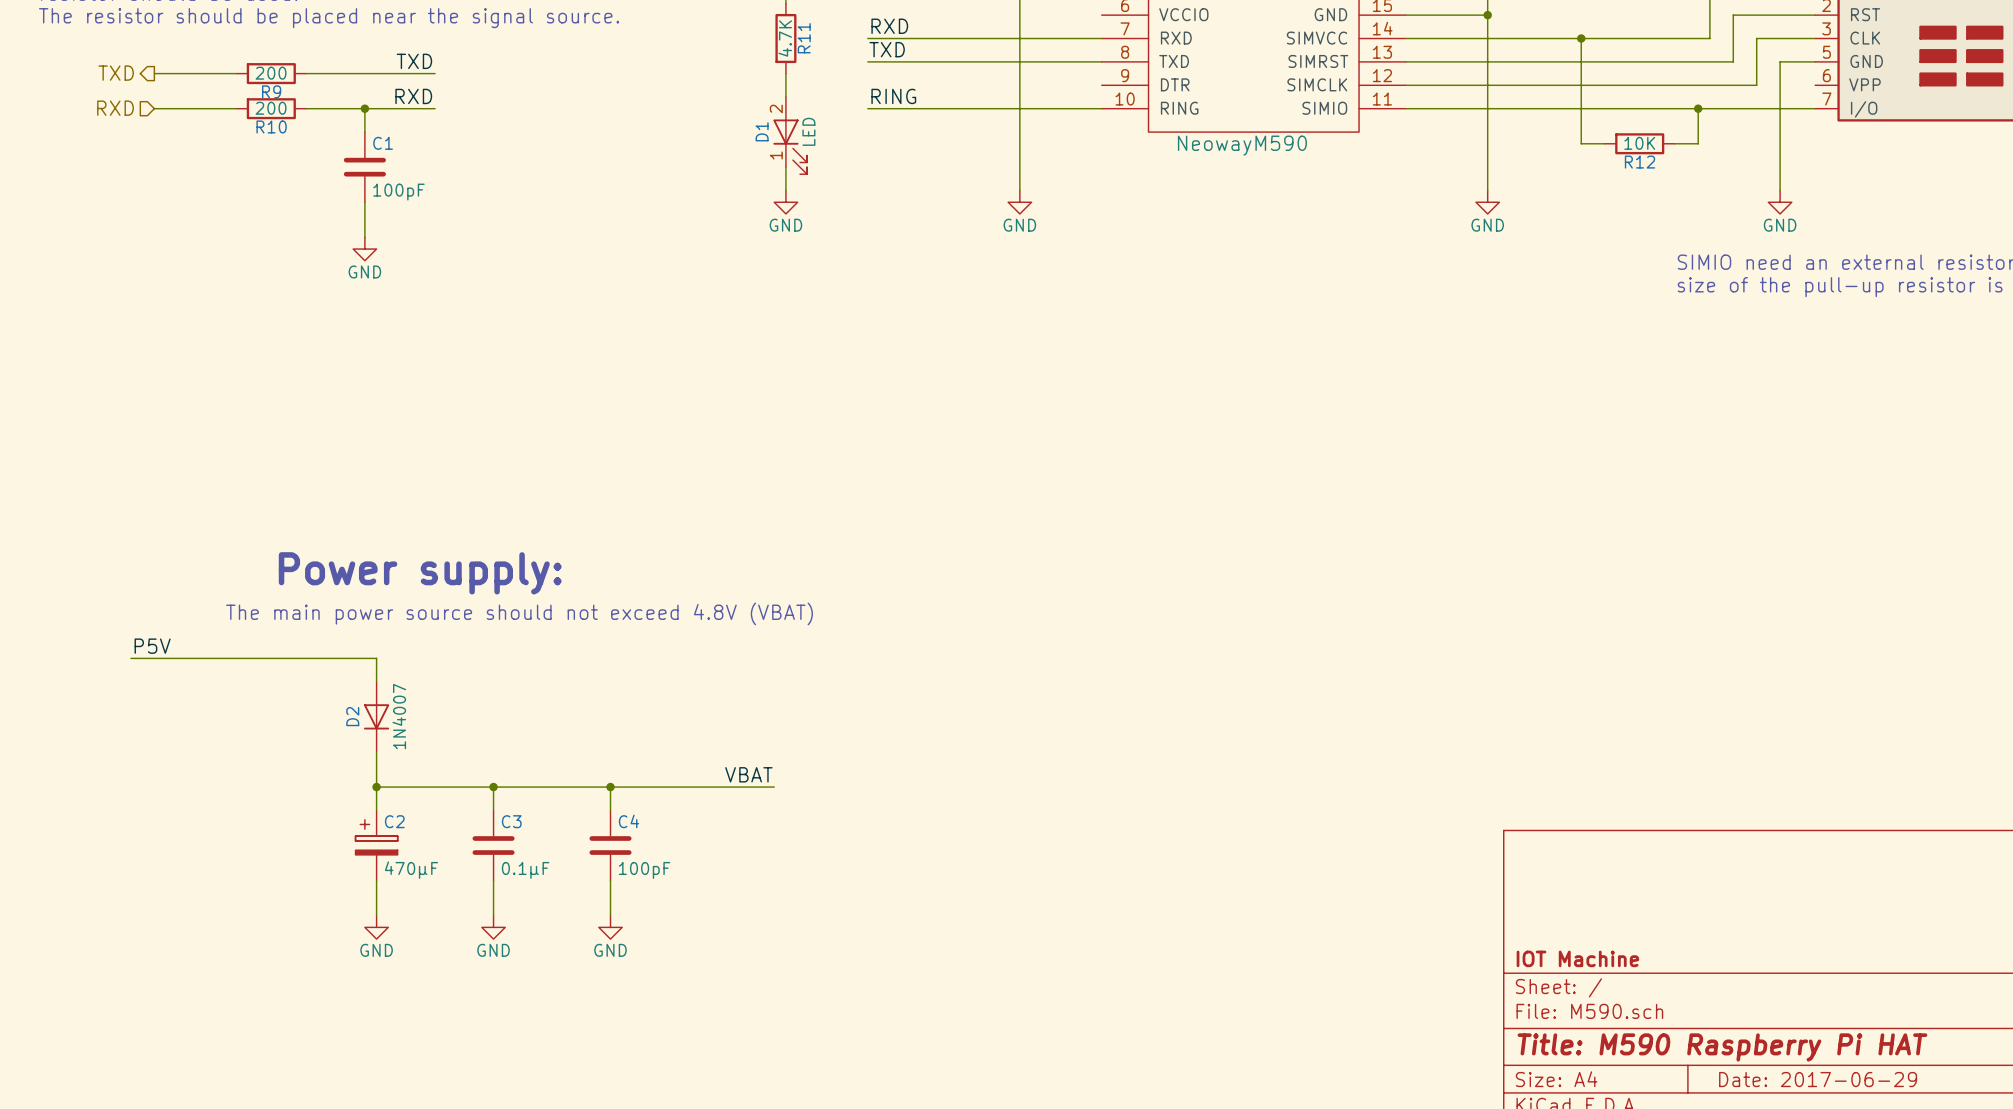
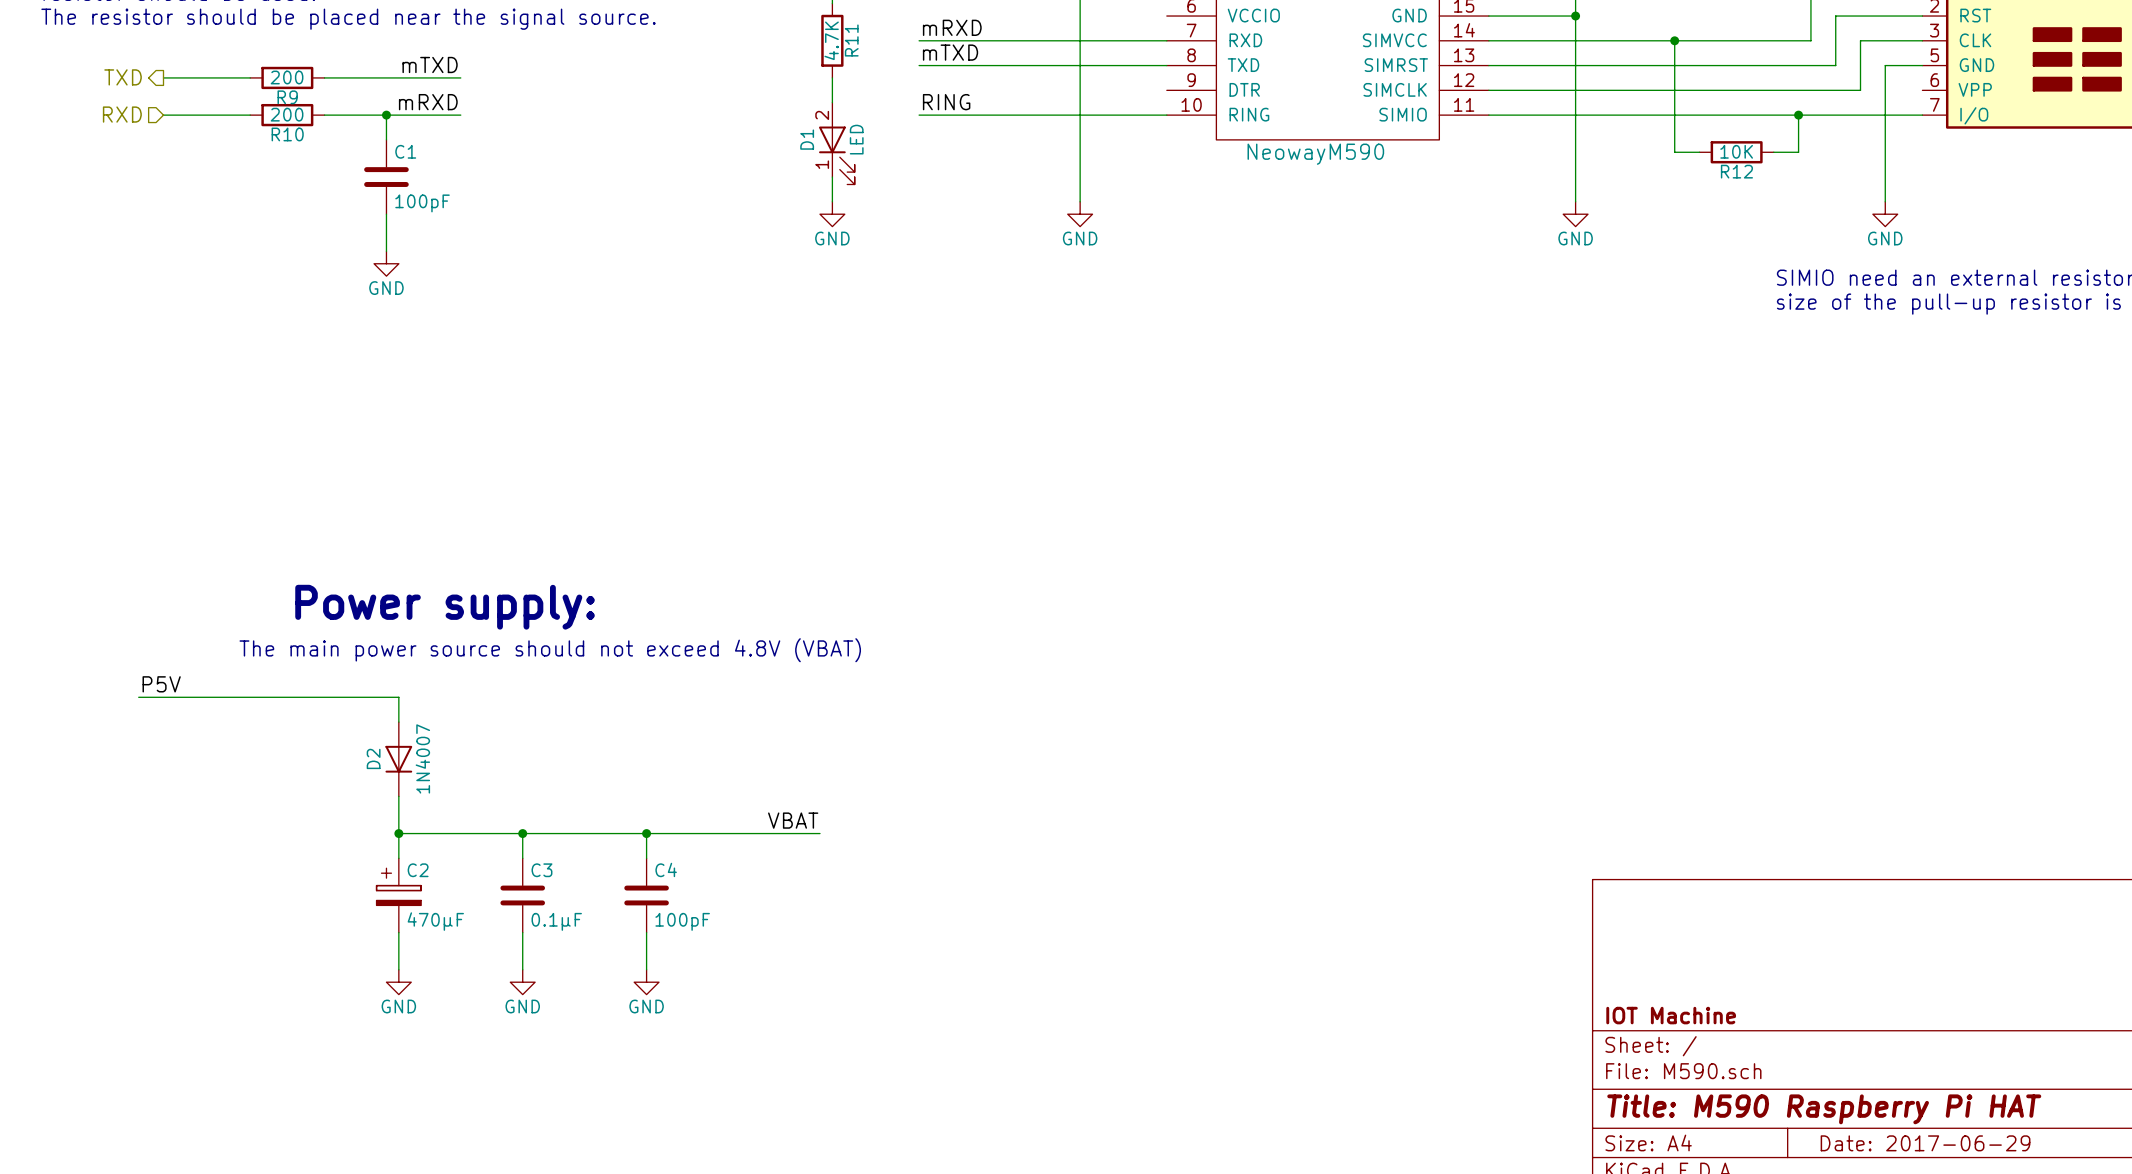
label: RXD (889, 26) -> mRXD (952, 27)
label: TXD (887, 49) -> mTXD (950, 52)
label: TXD (414, 61) -> mTXD (430, 64)
label: RXD (413, 96) -> mRXD (428, 102)

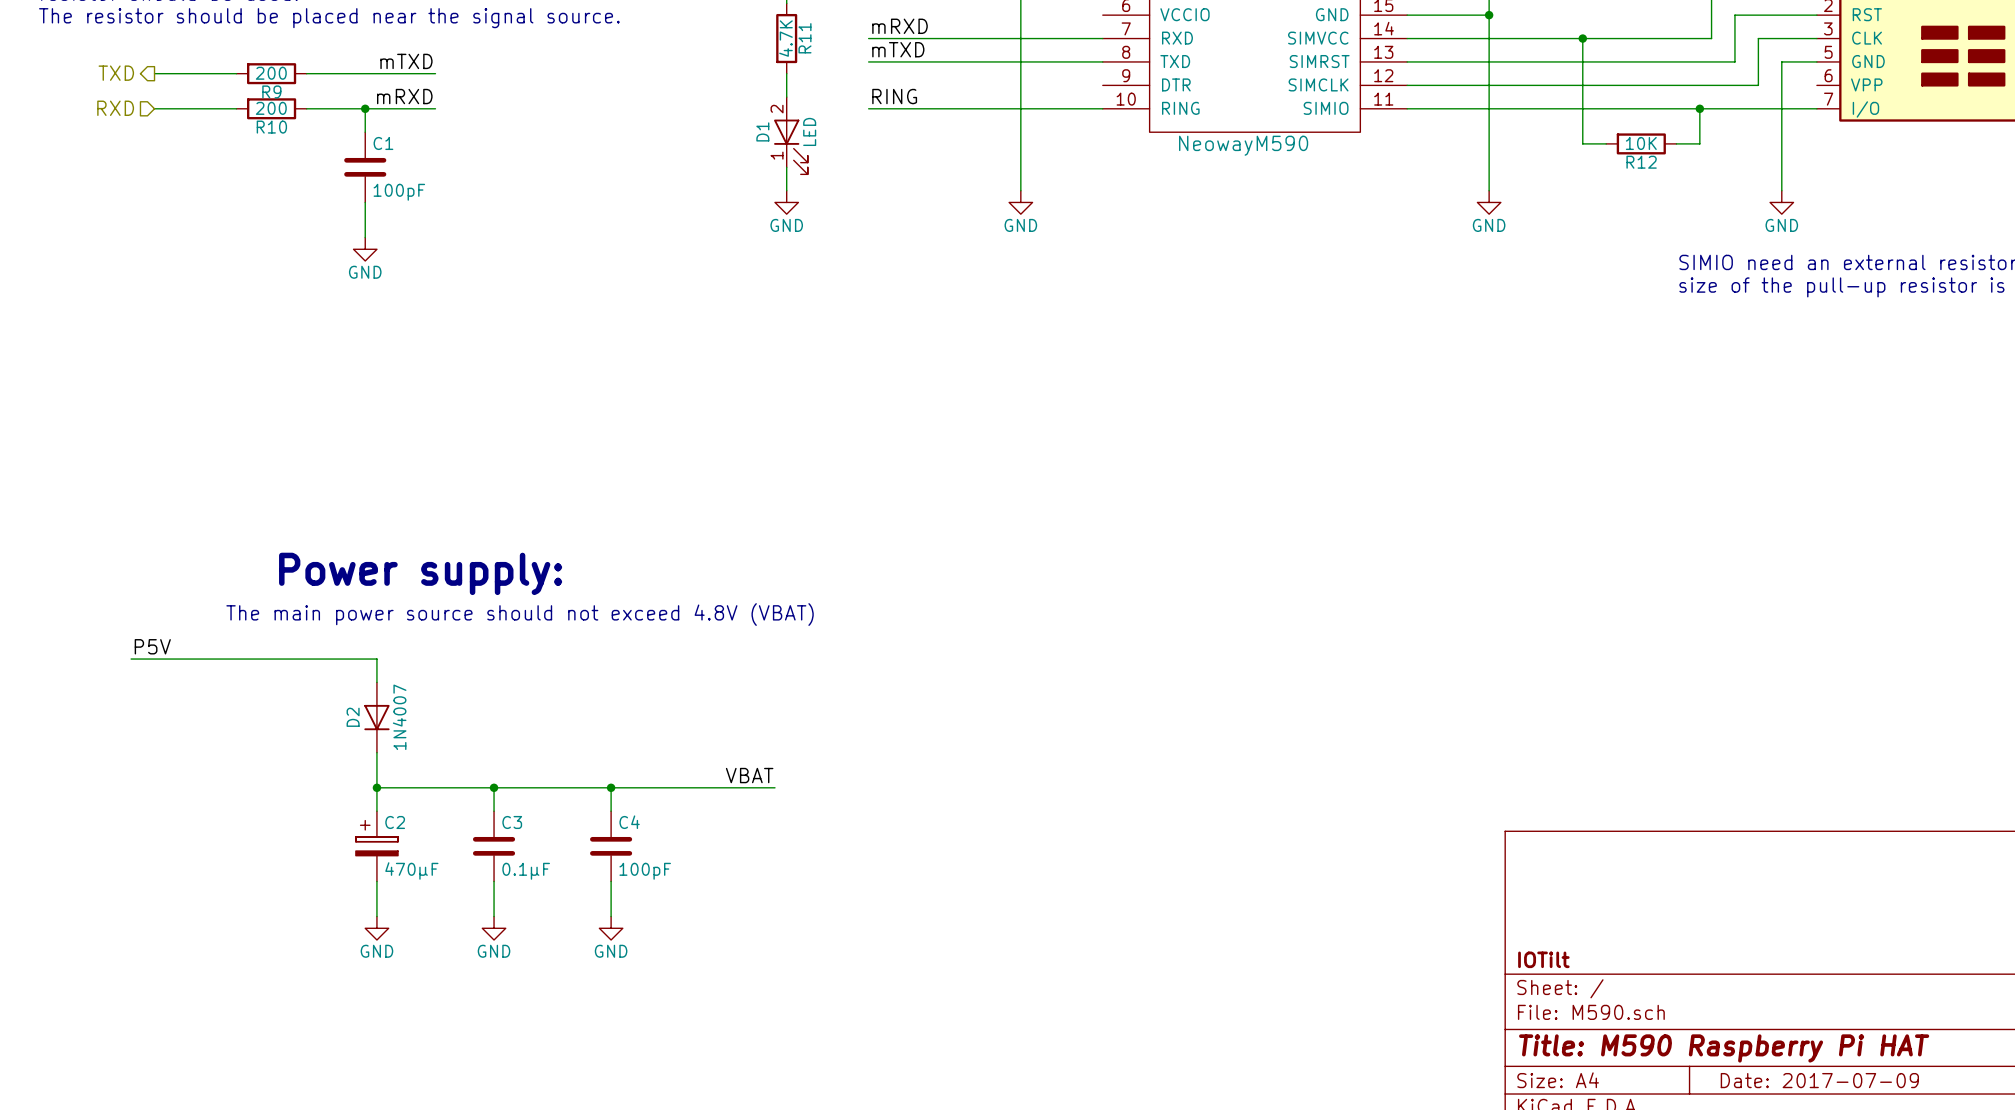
title block: IOT Machine (1671, 1015) -> IOTilt (1543, 959)
title block: Date: 2017-06-29 (1925, 1143) -> Date: 2017-07-09 (1819, 1080)

